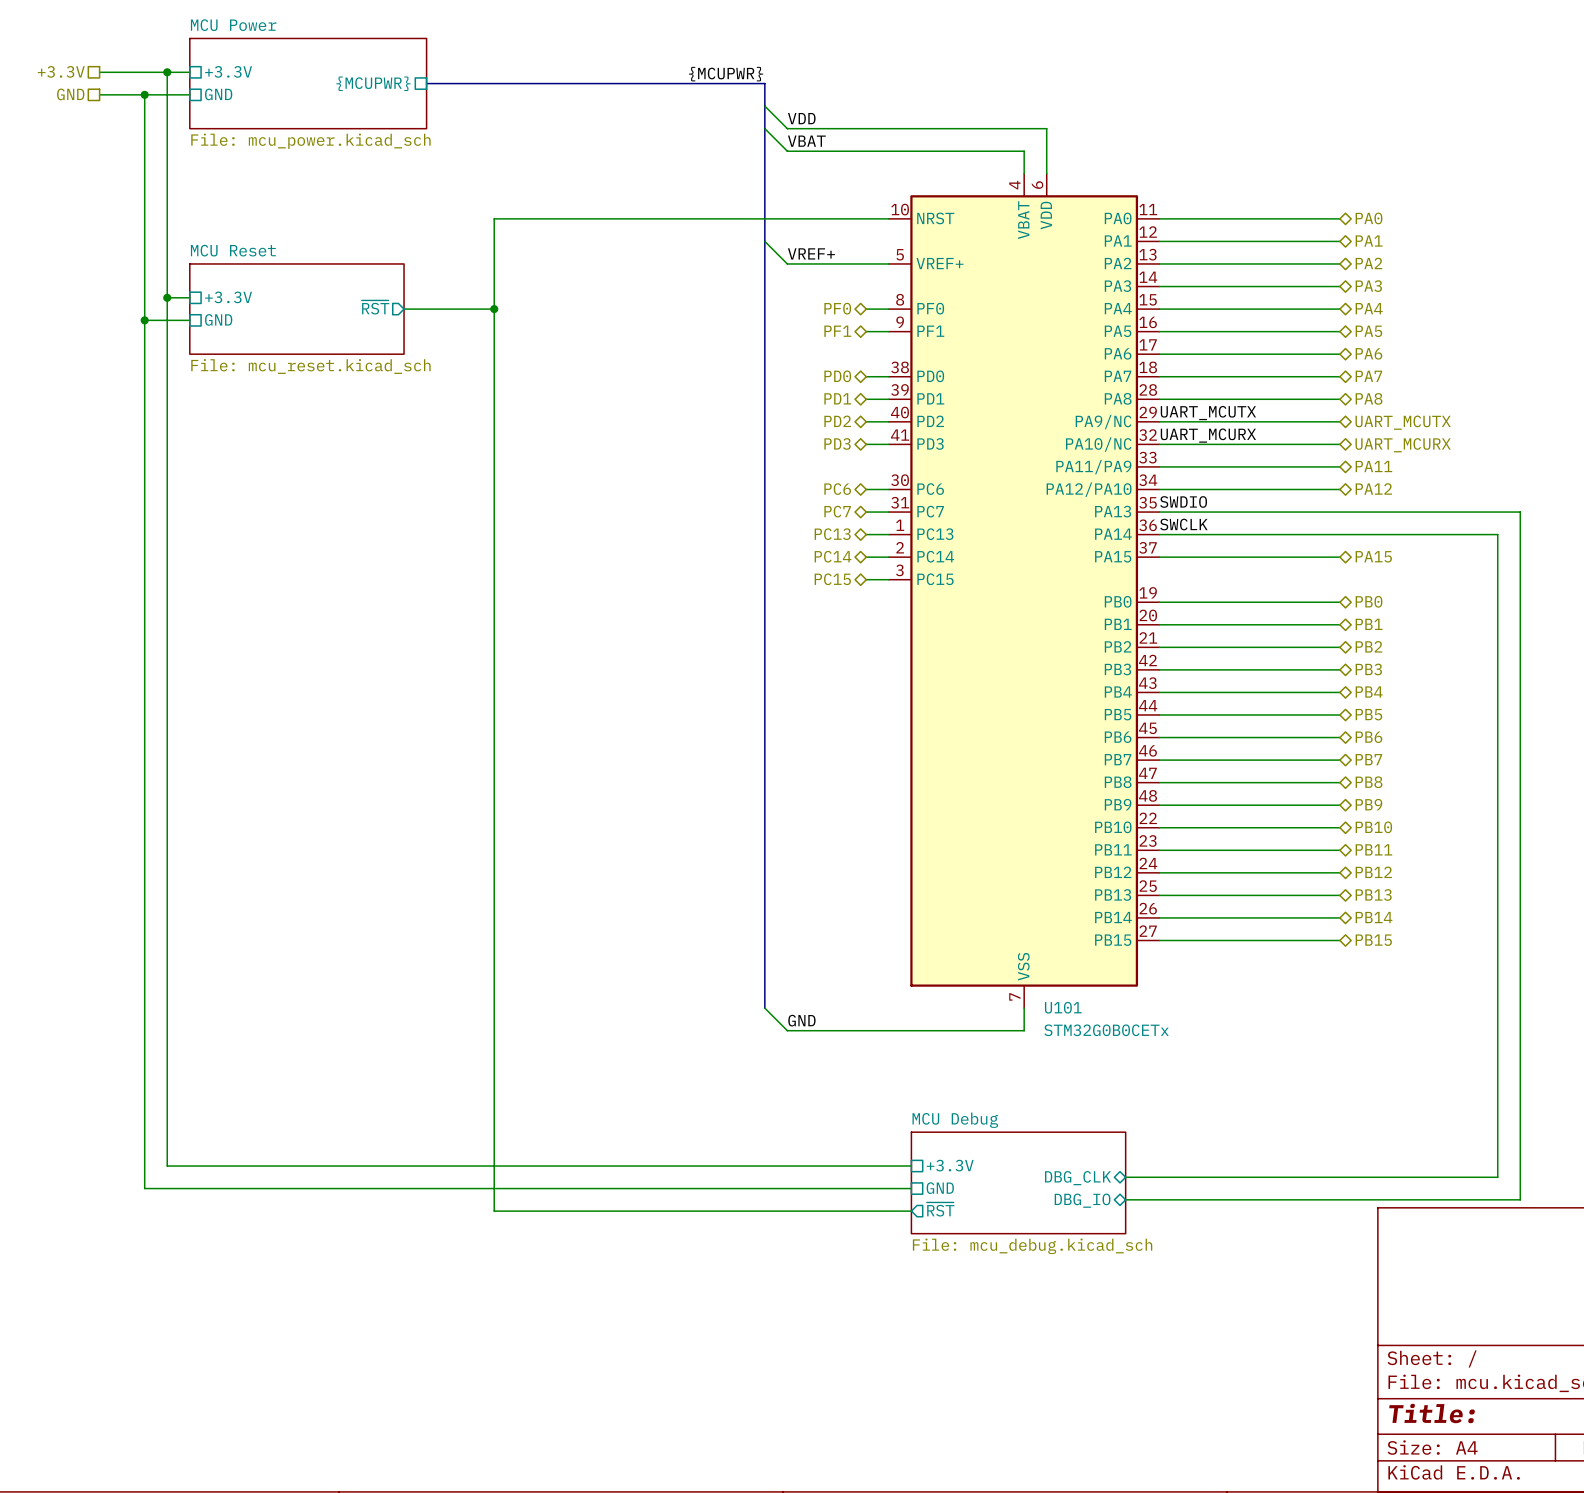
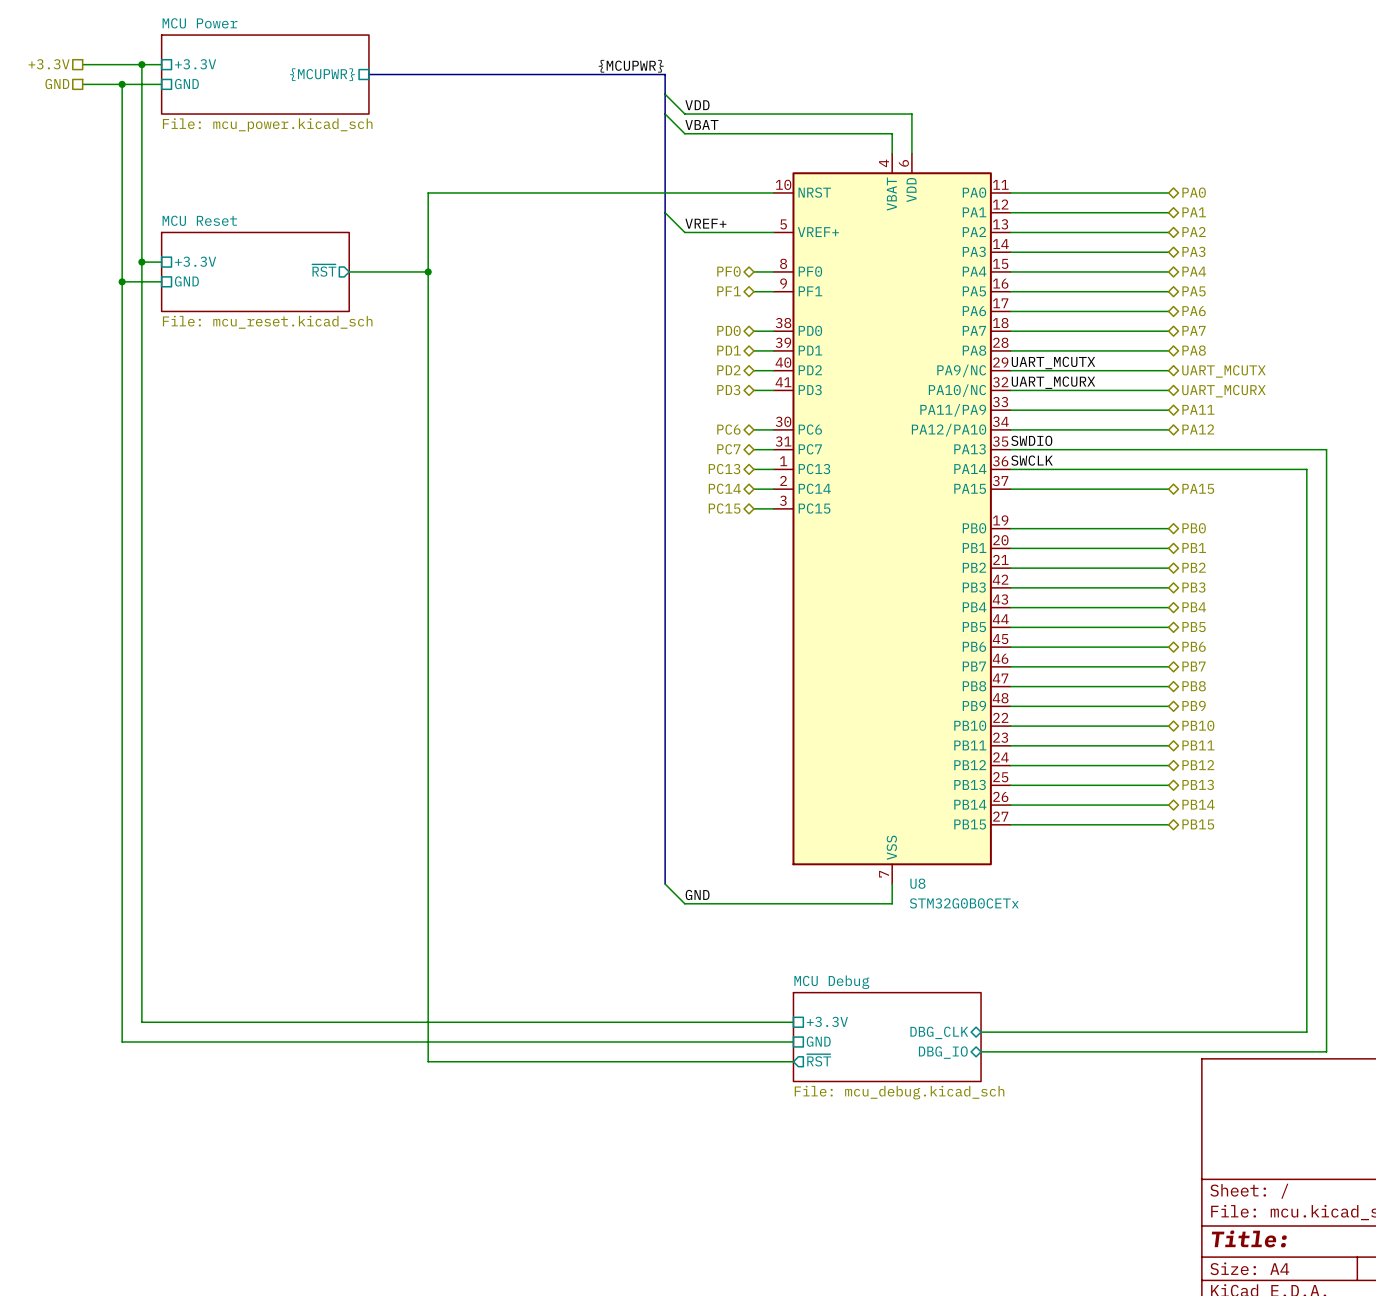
U101 name: U101 (1063, 1007) -> U8 (917, 883)

